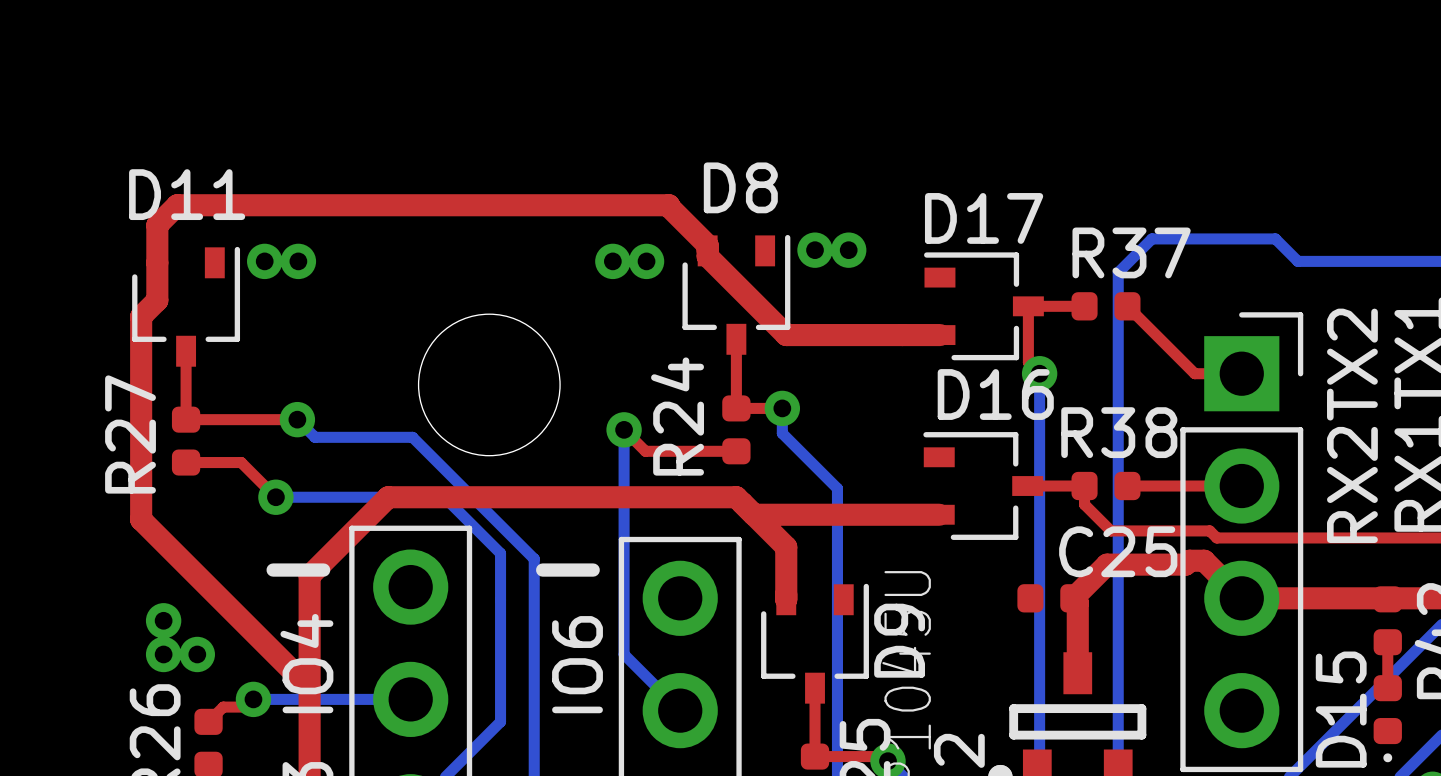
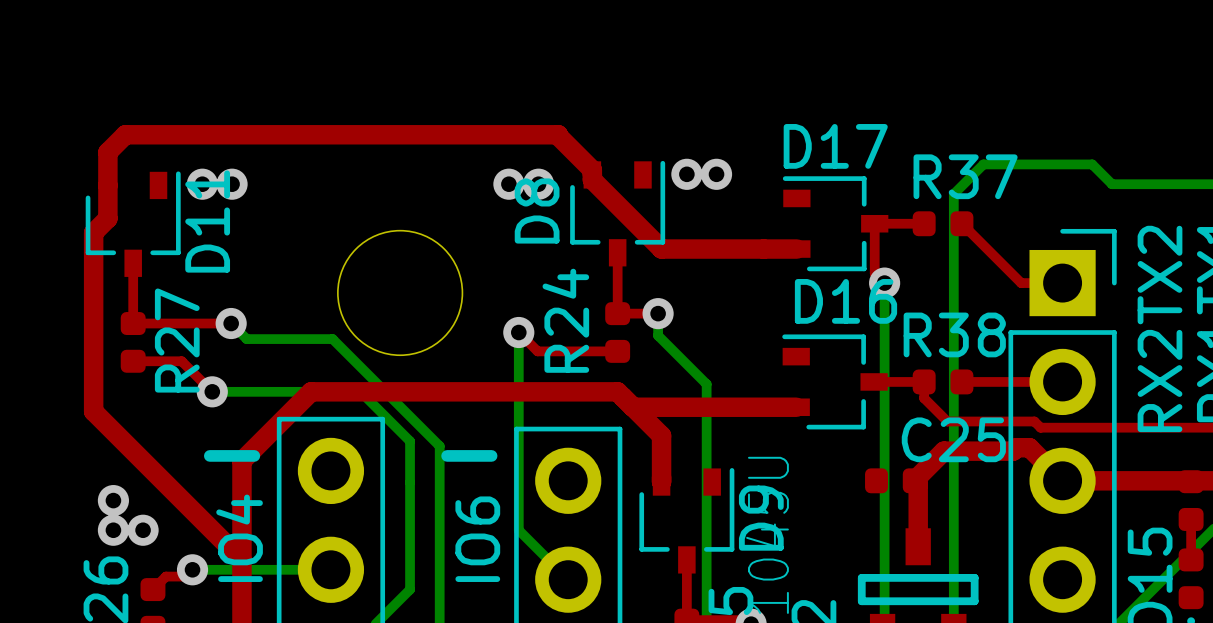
D8 name rotation: 0° (740, 187) -> 90° counterclockwise (537, 210)
D8 name position: D8 (740, 187) -> D8 (537, 210)
D11 name rotation: 0° (187, 194) -> 90° counterclockwise (207, 221)
R27 name position: R27 (130, 434) -> R27 (177, 340)

